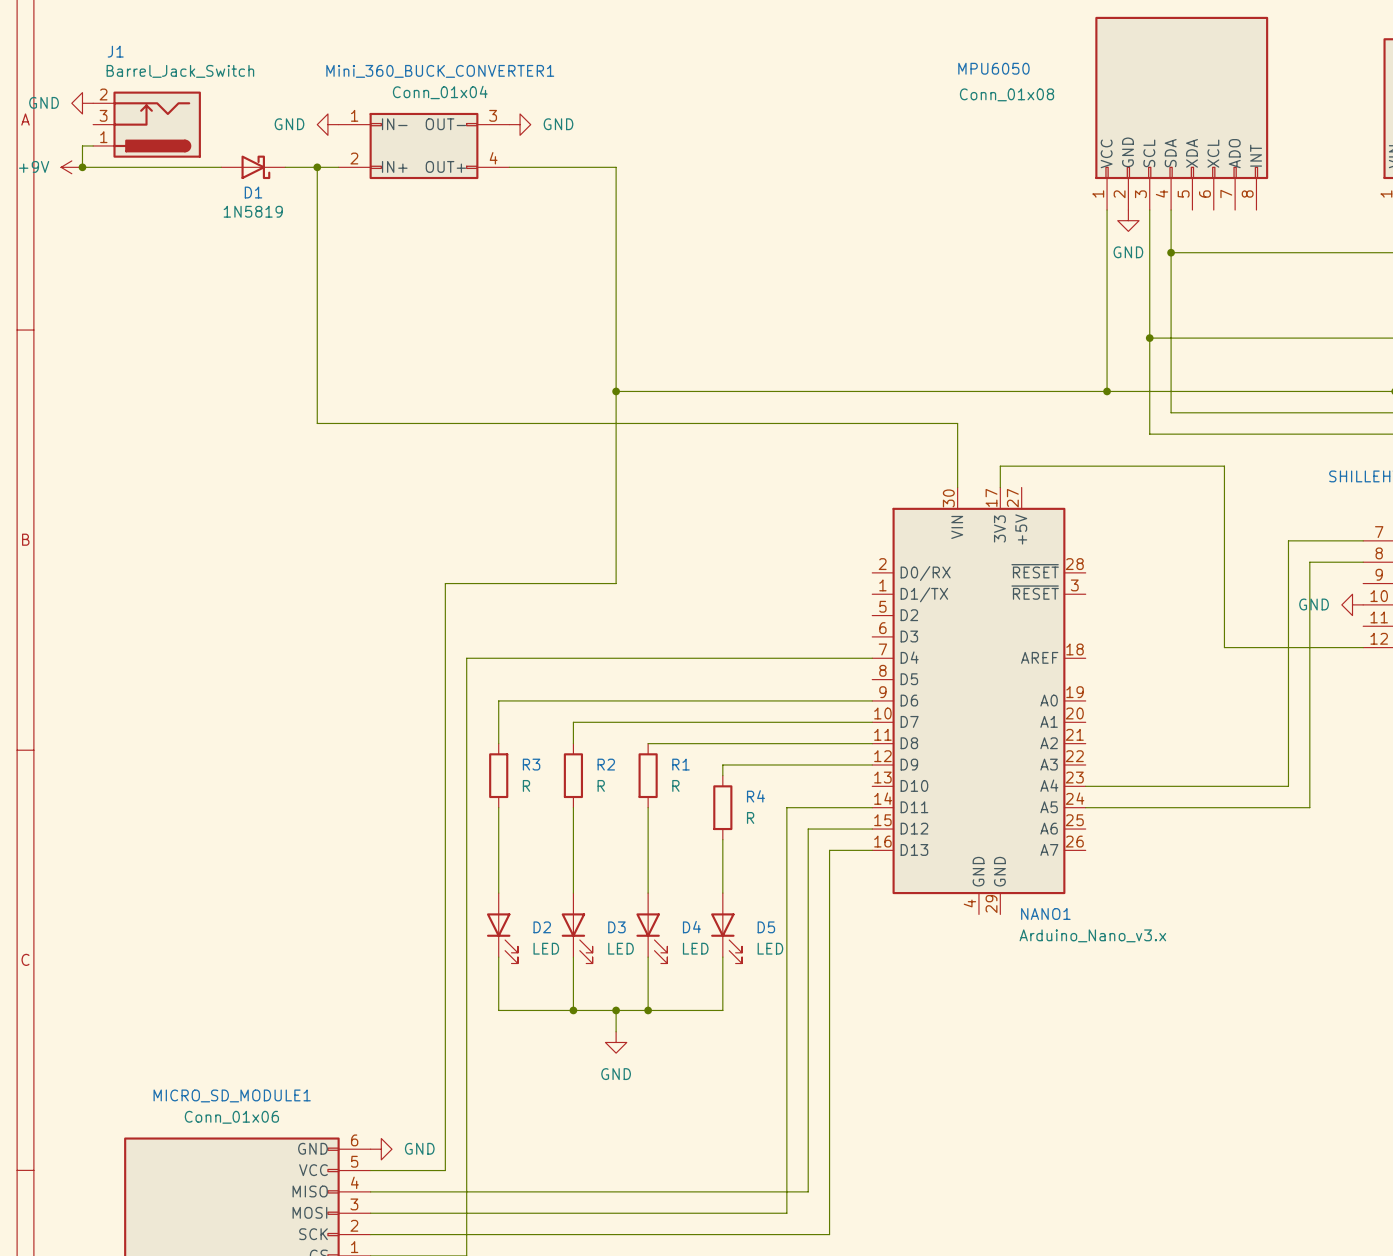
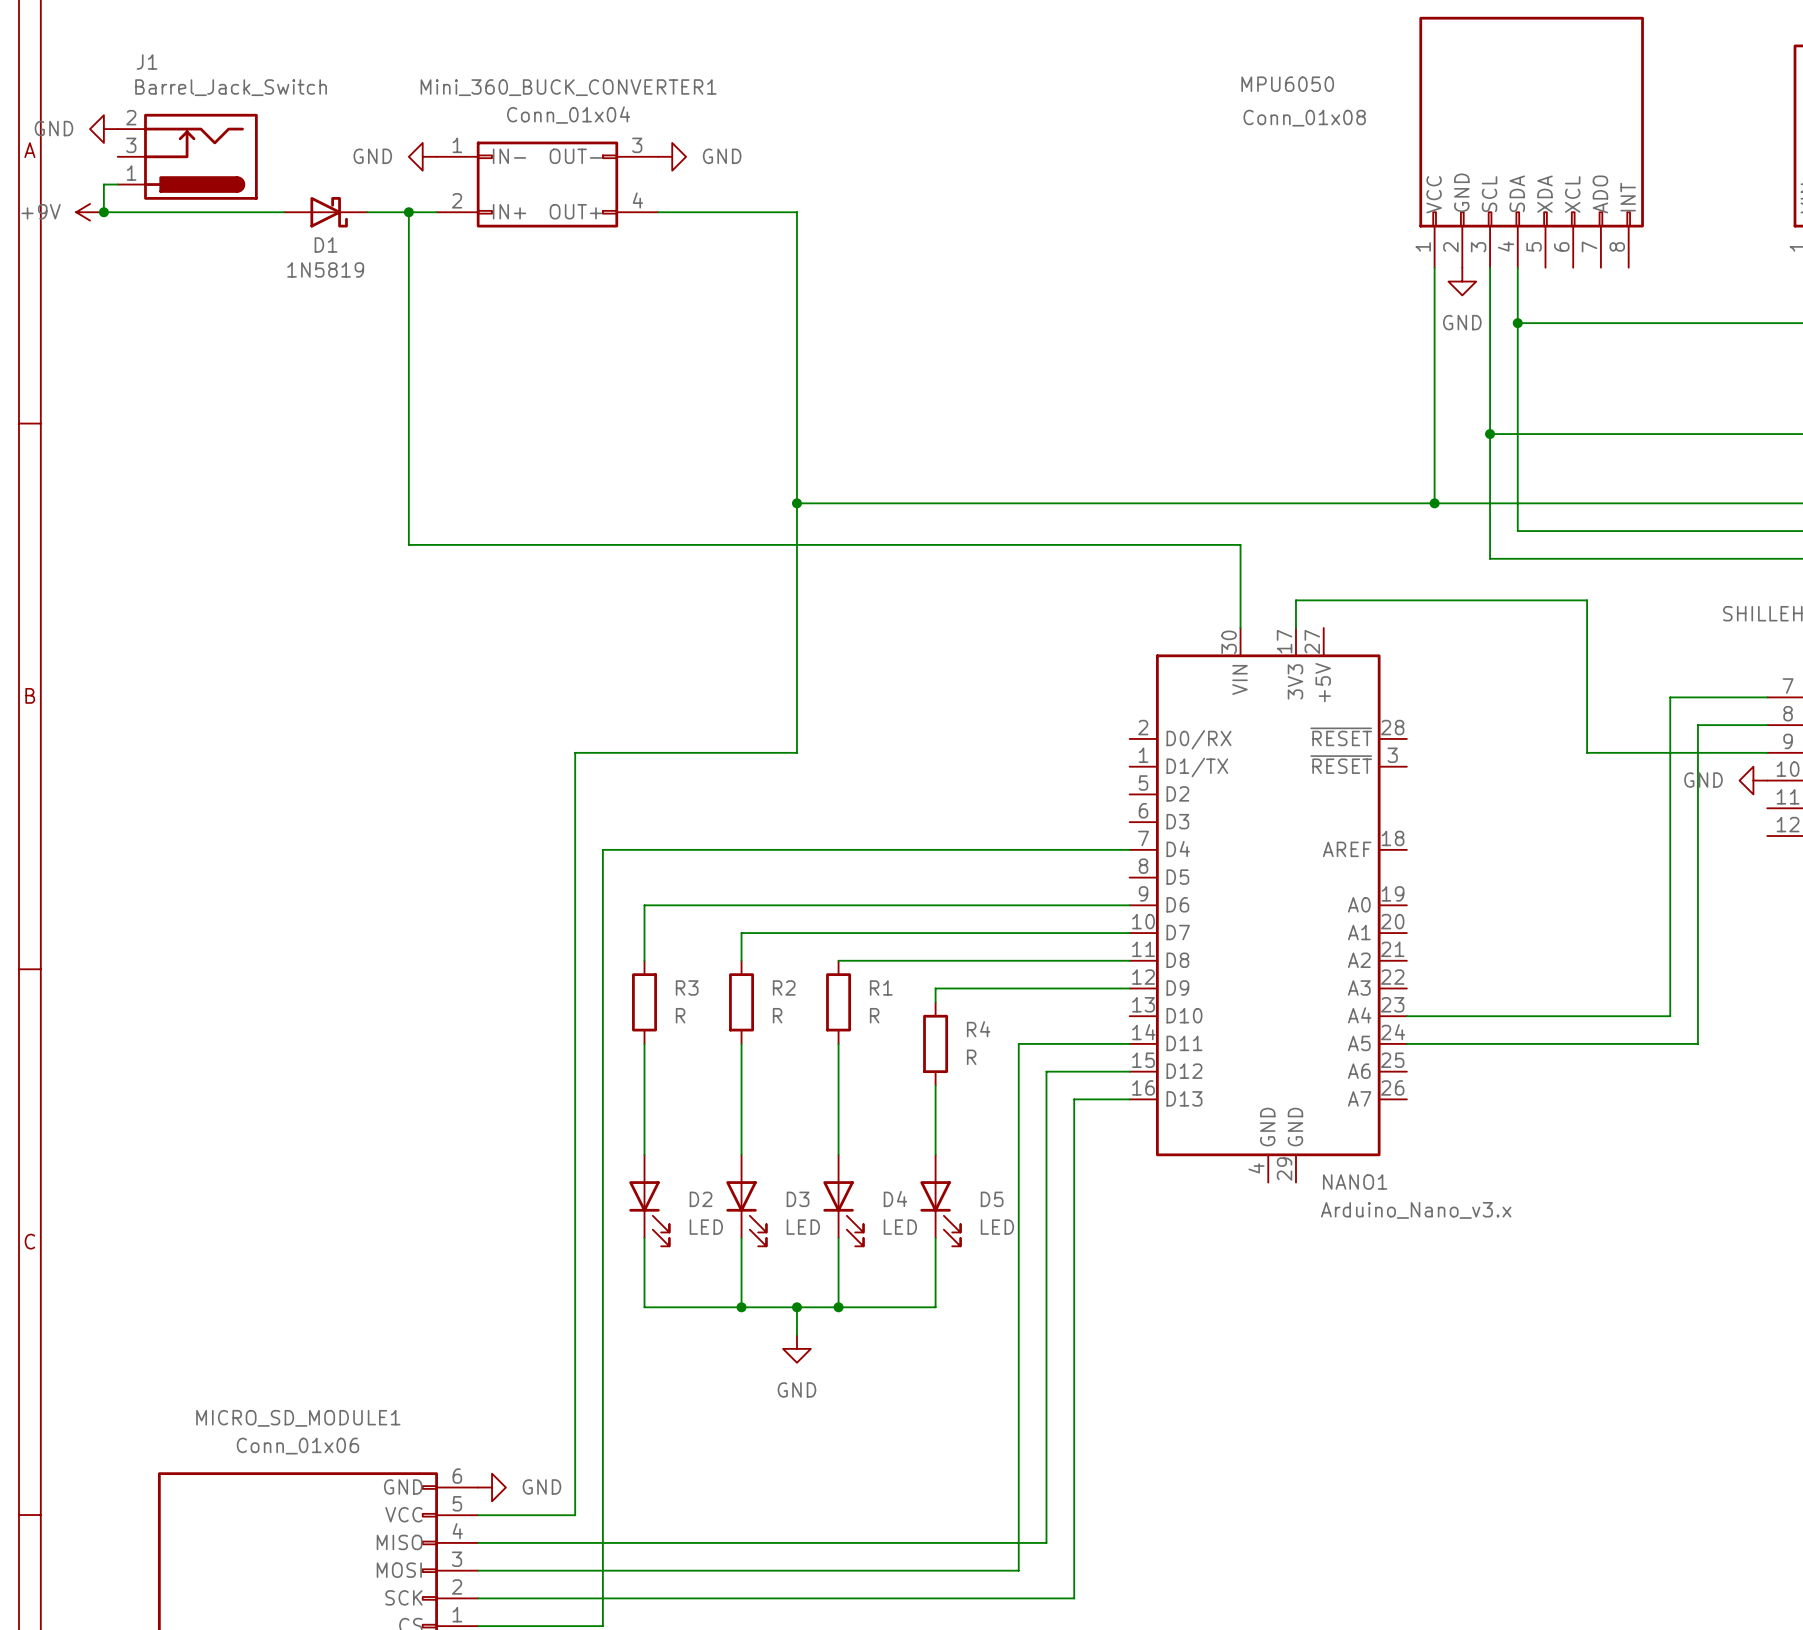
wire: (1224, 583) (1224, 647) (1363, 647) -> (1587, 752) (1767, 752)

